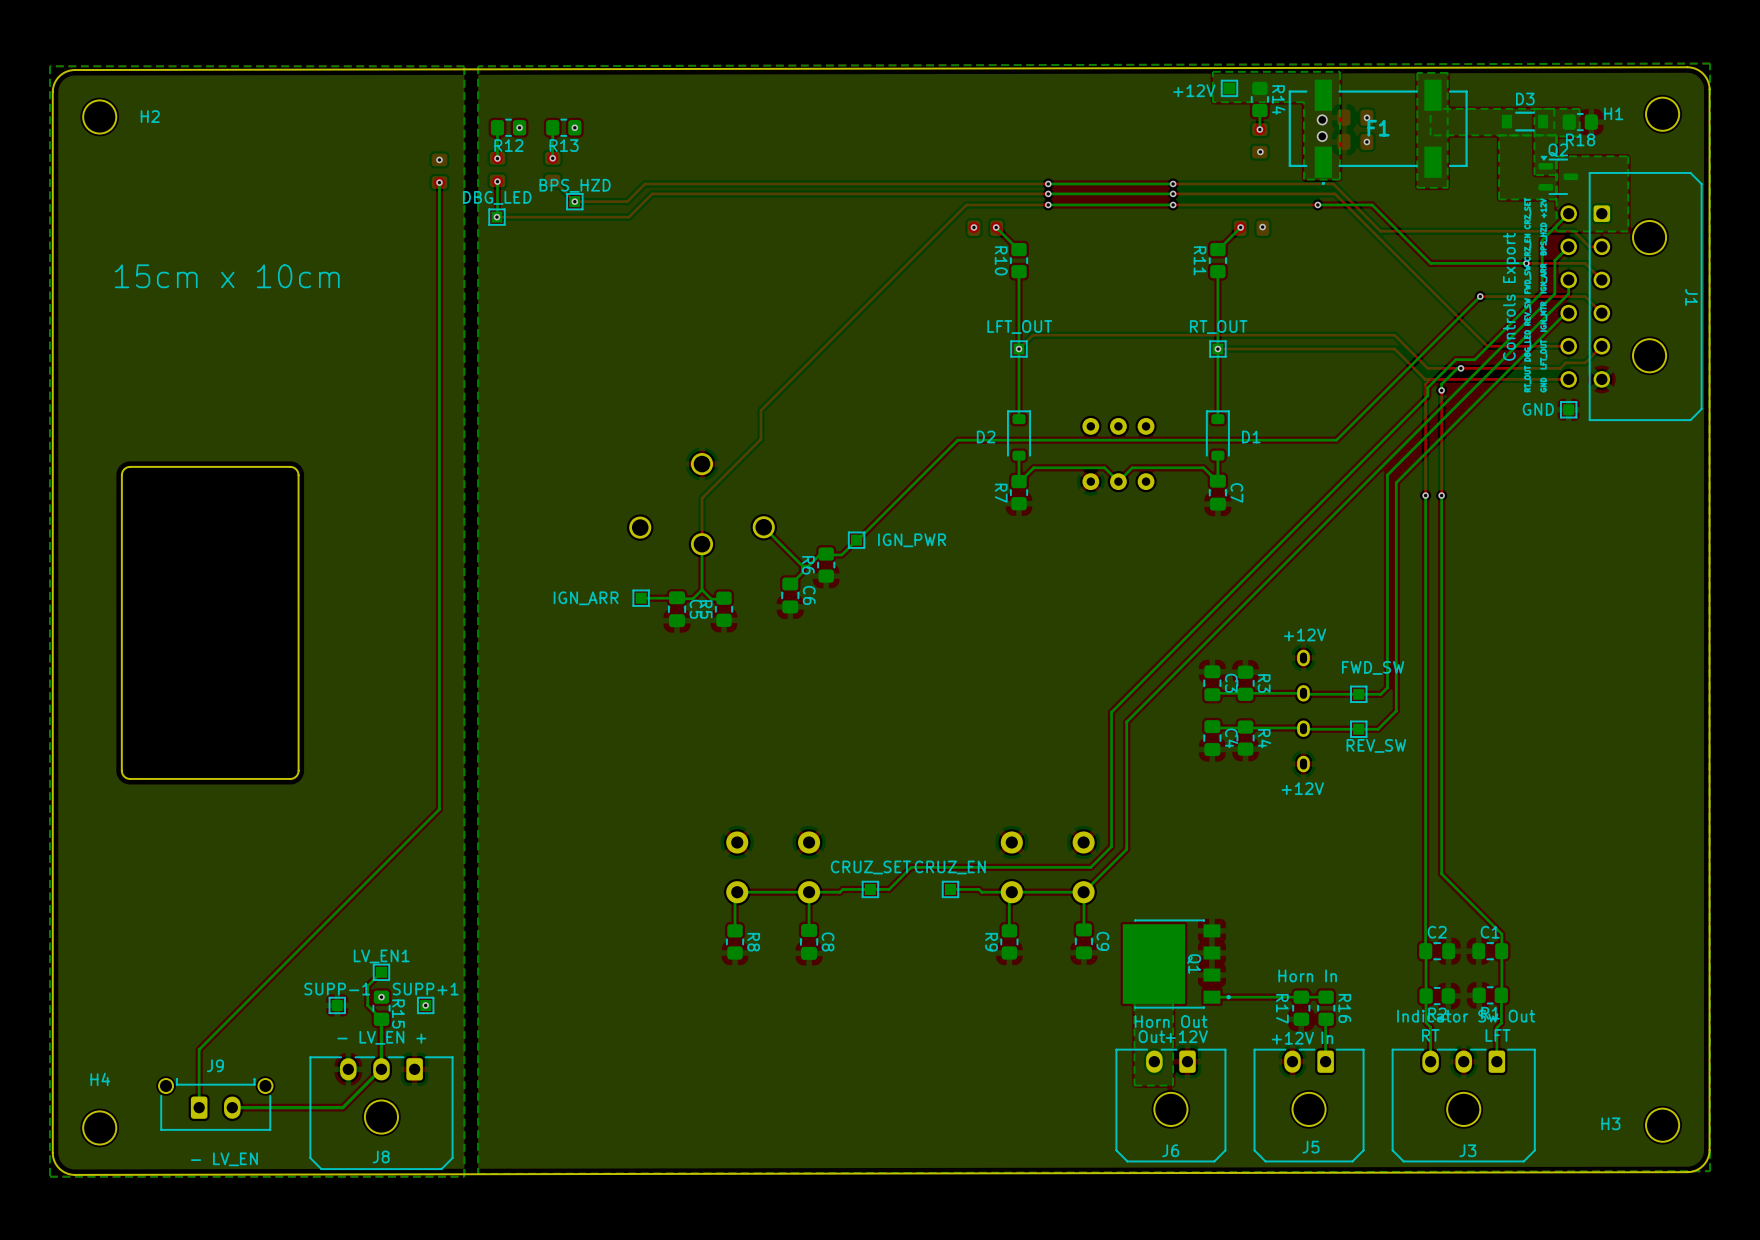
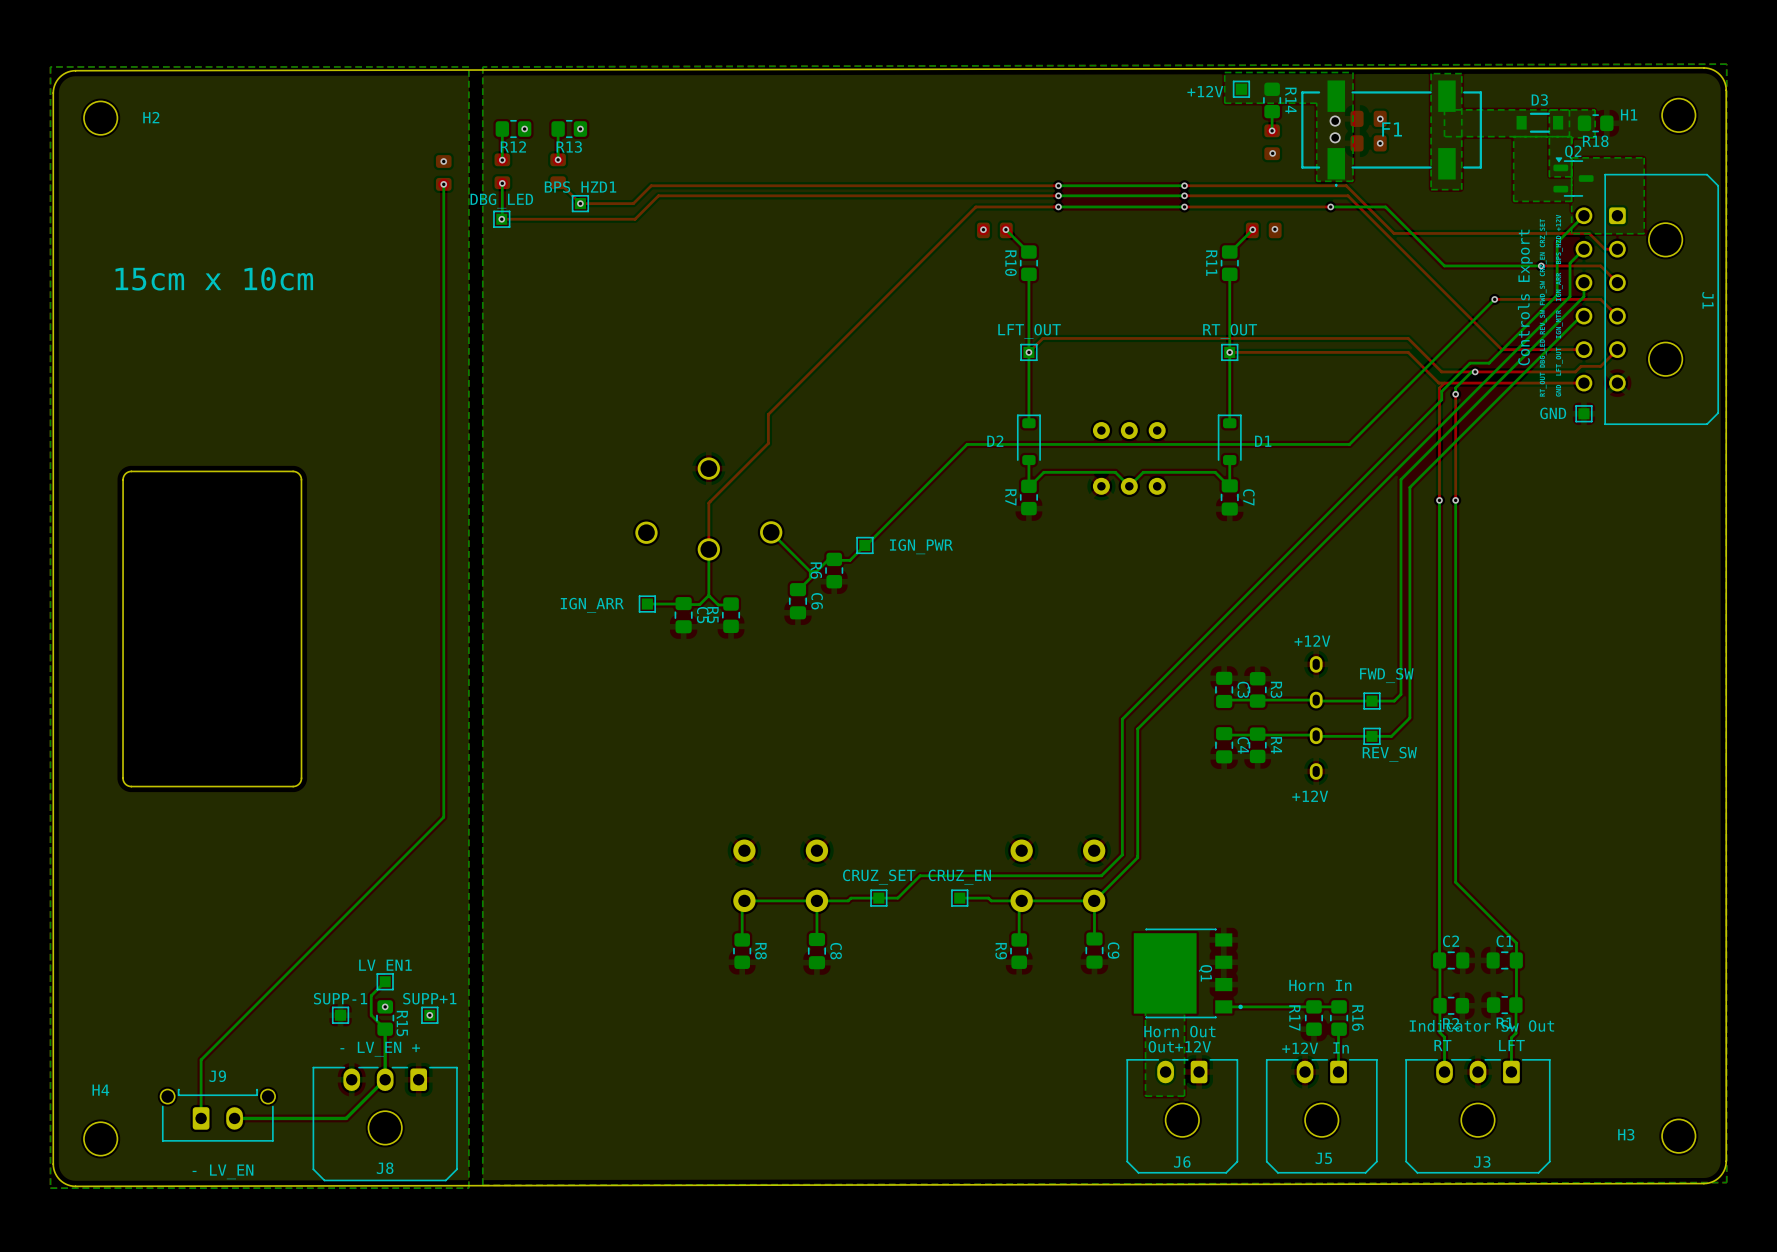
BPS_HZD name: BPS_HZD (575, 185) -> BPS_HZD1 (580, 188)

